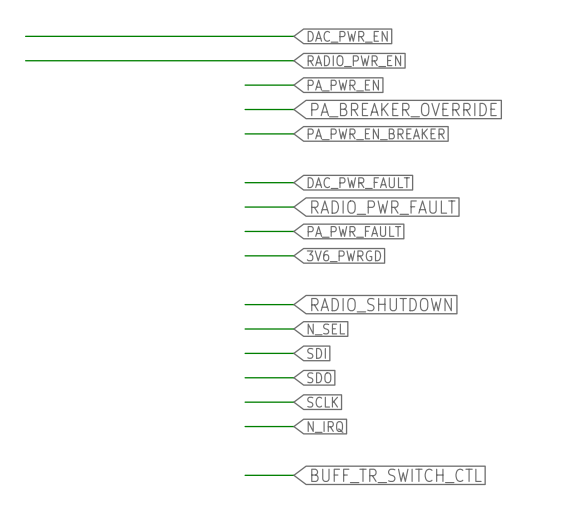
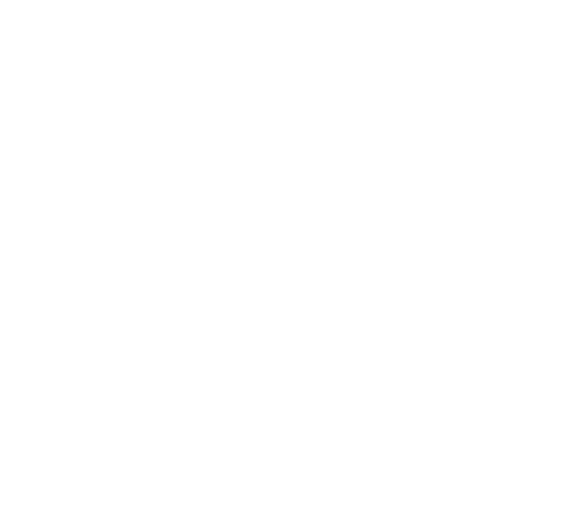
wire: (25, 36) (293, 36) -> none
global label: DAC_PWR_EN (347, 36) -> none
wire: (25, 60) (293, 60) -> none
global label: RADIO_PWR_EN (354, 61) -> none
wire: (245, 85) (293, 85) -> none
global label: PA_PWR_EN (343, 85) -> none
wire: (245, 109) (293, 109) -> none
global label: PA_BREAKER_OVERRIDE (404, 110) -> none
wire: (245, 133) (293, 133) -> none
global label: PA_PWR_EN_BREAKER (376, 134) -> none
wire: (245, 182) (293, 182) -> none
global label: DAC_PWR_FAULT (358, 183) -> none
wire: (245, 207) (293, 207) -> none
global label: RADIO_PWR_FAULT (383, 207) -> none
wire: (245, 231) (293, 231) -> none
global label: PA_PWR_FAULT (354, 231) -> none
wire: (245, 255) (293, 255) -> none
global label: 3V6_PWRGD (343, 256) -> none
wire: (245, 304) (293, 304) -> none
global label: RADIO_SHUTDOWN (381, 305) -> none
wire: (245, 329) (293, 329) -> none
global label: N_SEL (326, 329) -> none
wire: (245, 353) (293, 353) -> none
global label: SDI (316, 353) -> none
wire: (245, 377) (293, 377) -> none
global label: SDO (319, 377) -> none
wire: (245, 402) (293, 402) -> none
global label: SCLK (322, 402) -> none
wire: (245, 426) (293, 426) -> none
global label: N_IRQ (325, 427) -> none
wire: (245, 475) (293, 475) -> none
global label: BUFF_TR_SWITCH_CTL (396, 475) -> none

